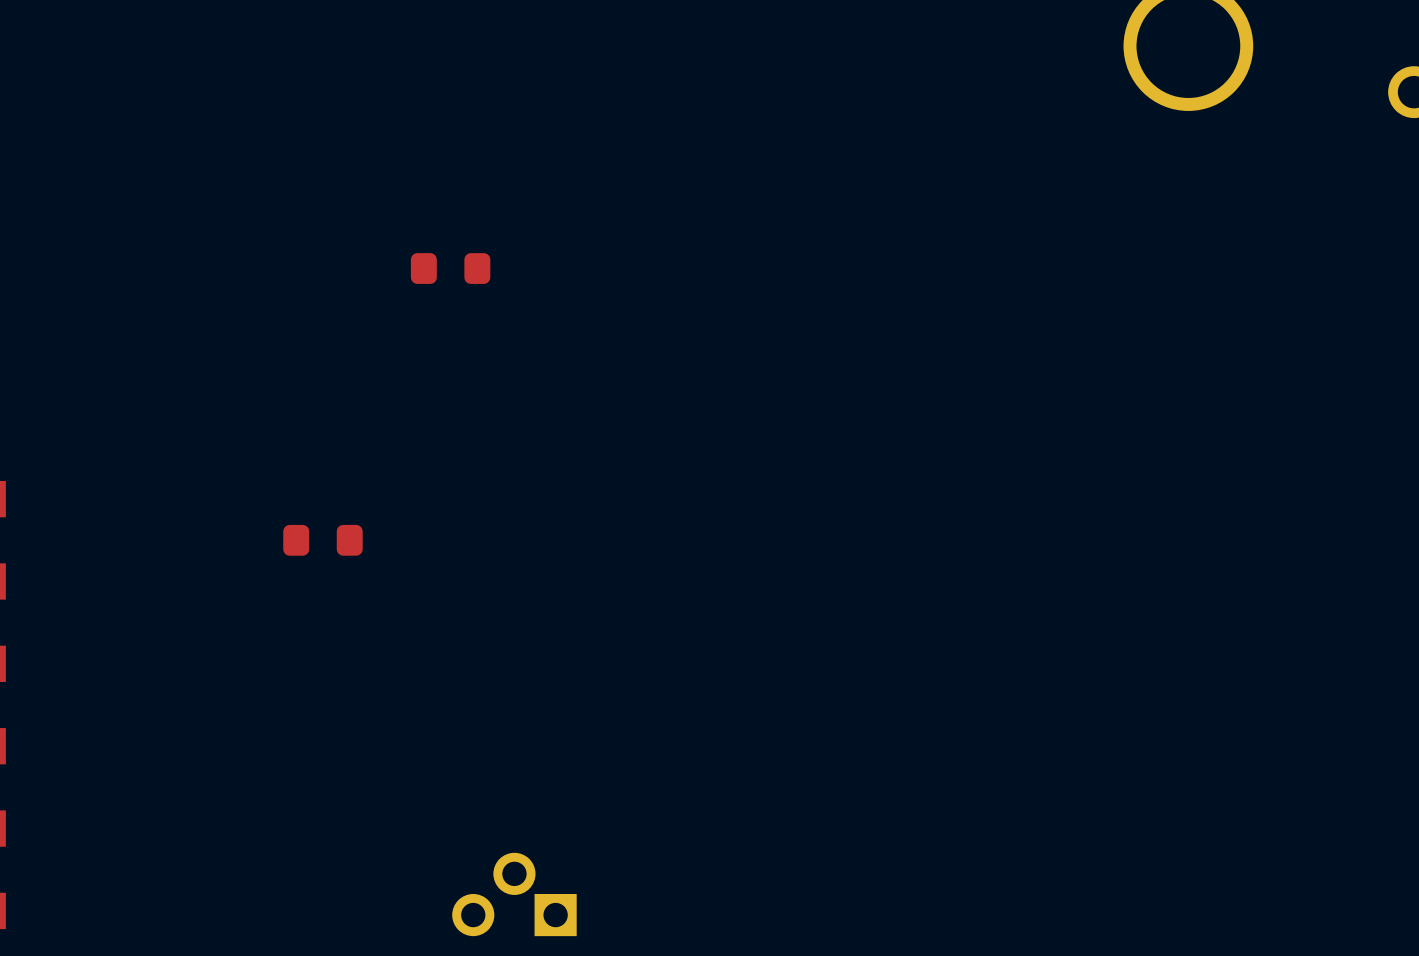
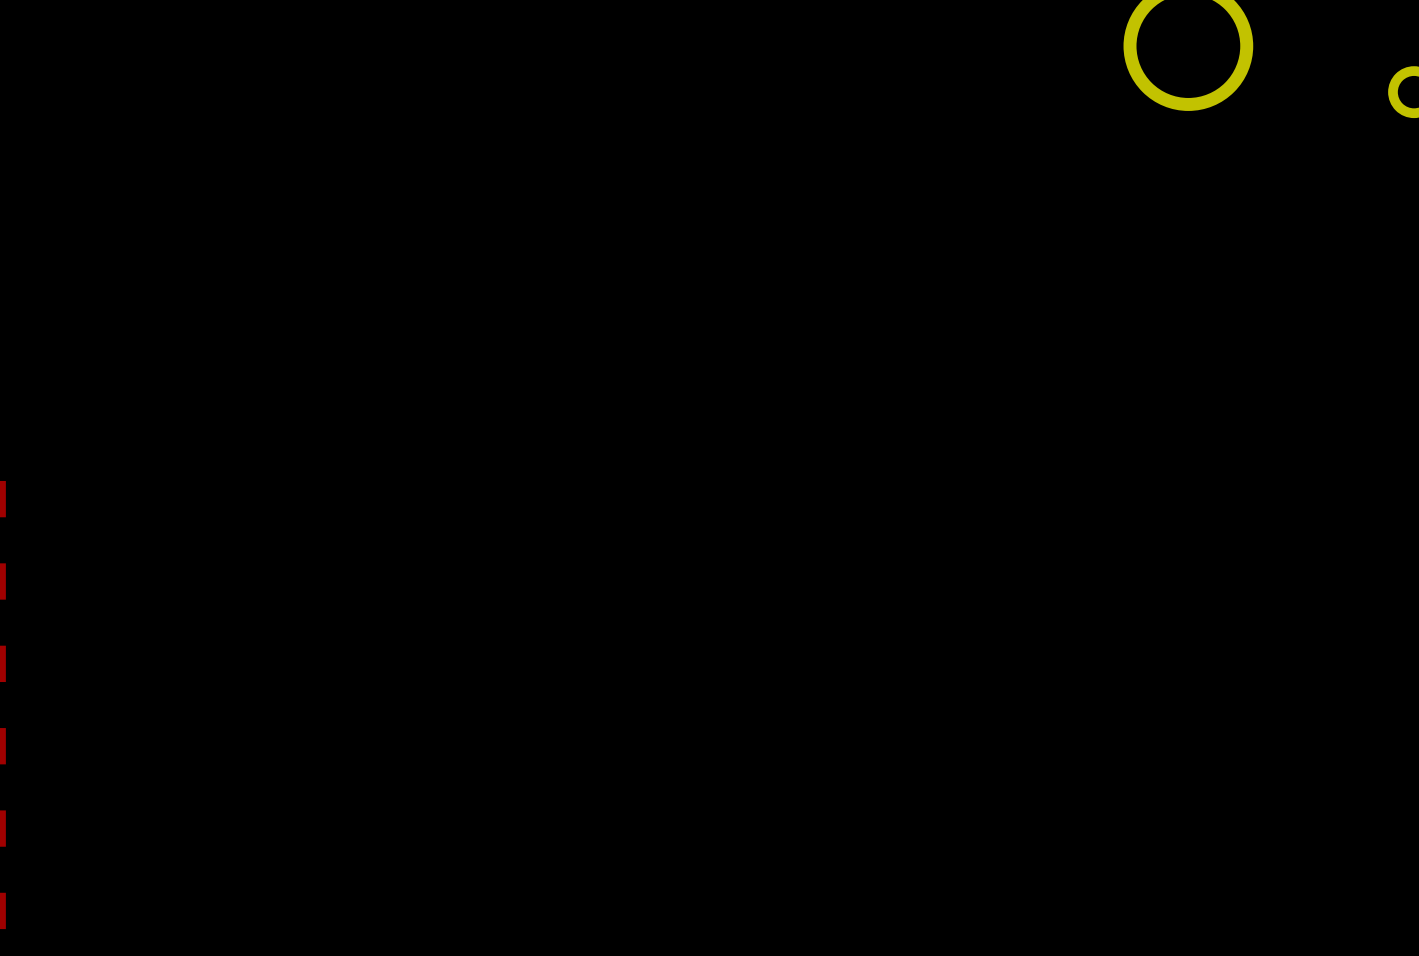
part: (450, 268) -> none
part: (322, 540) -> none
part: (514, 894) -> none

